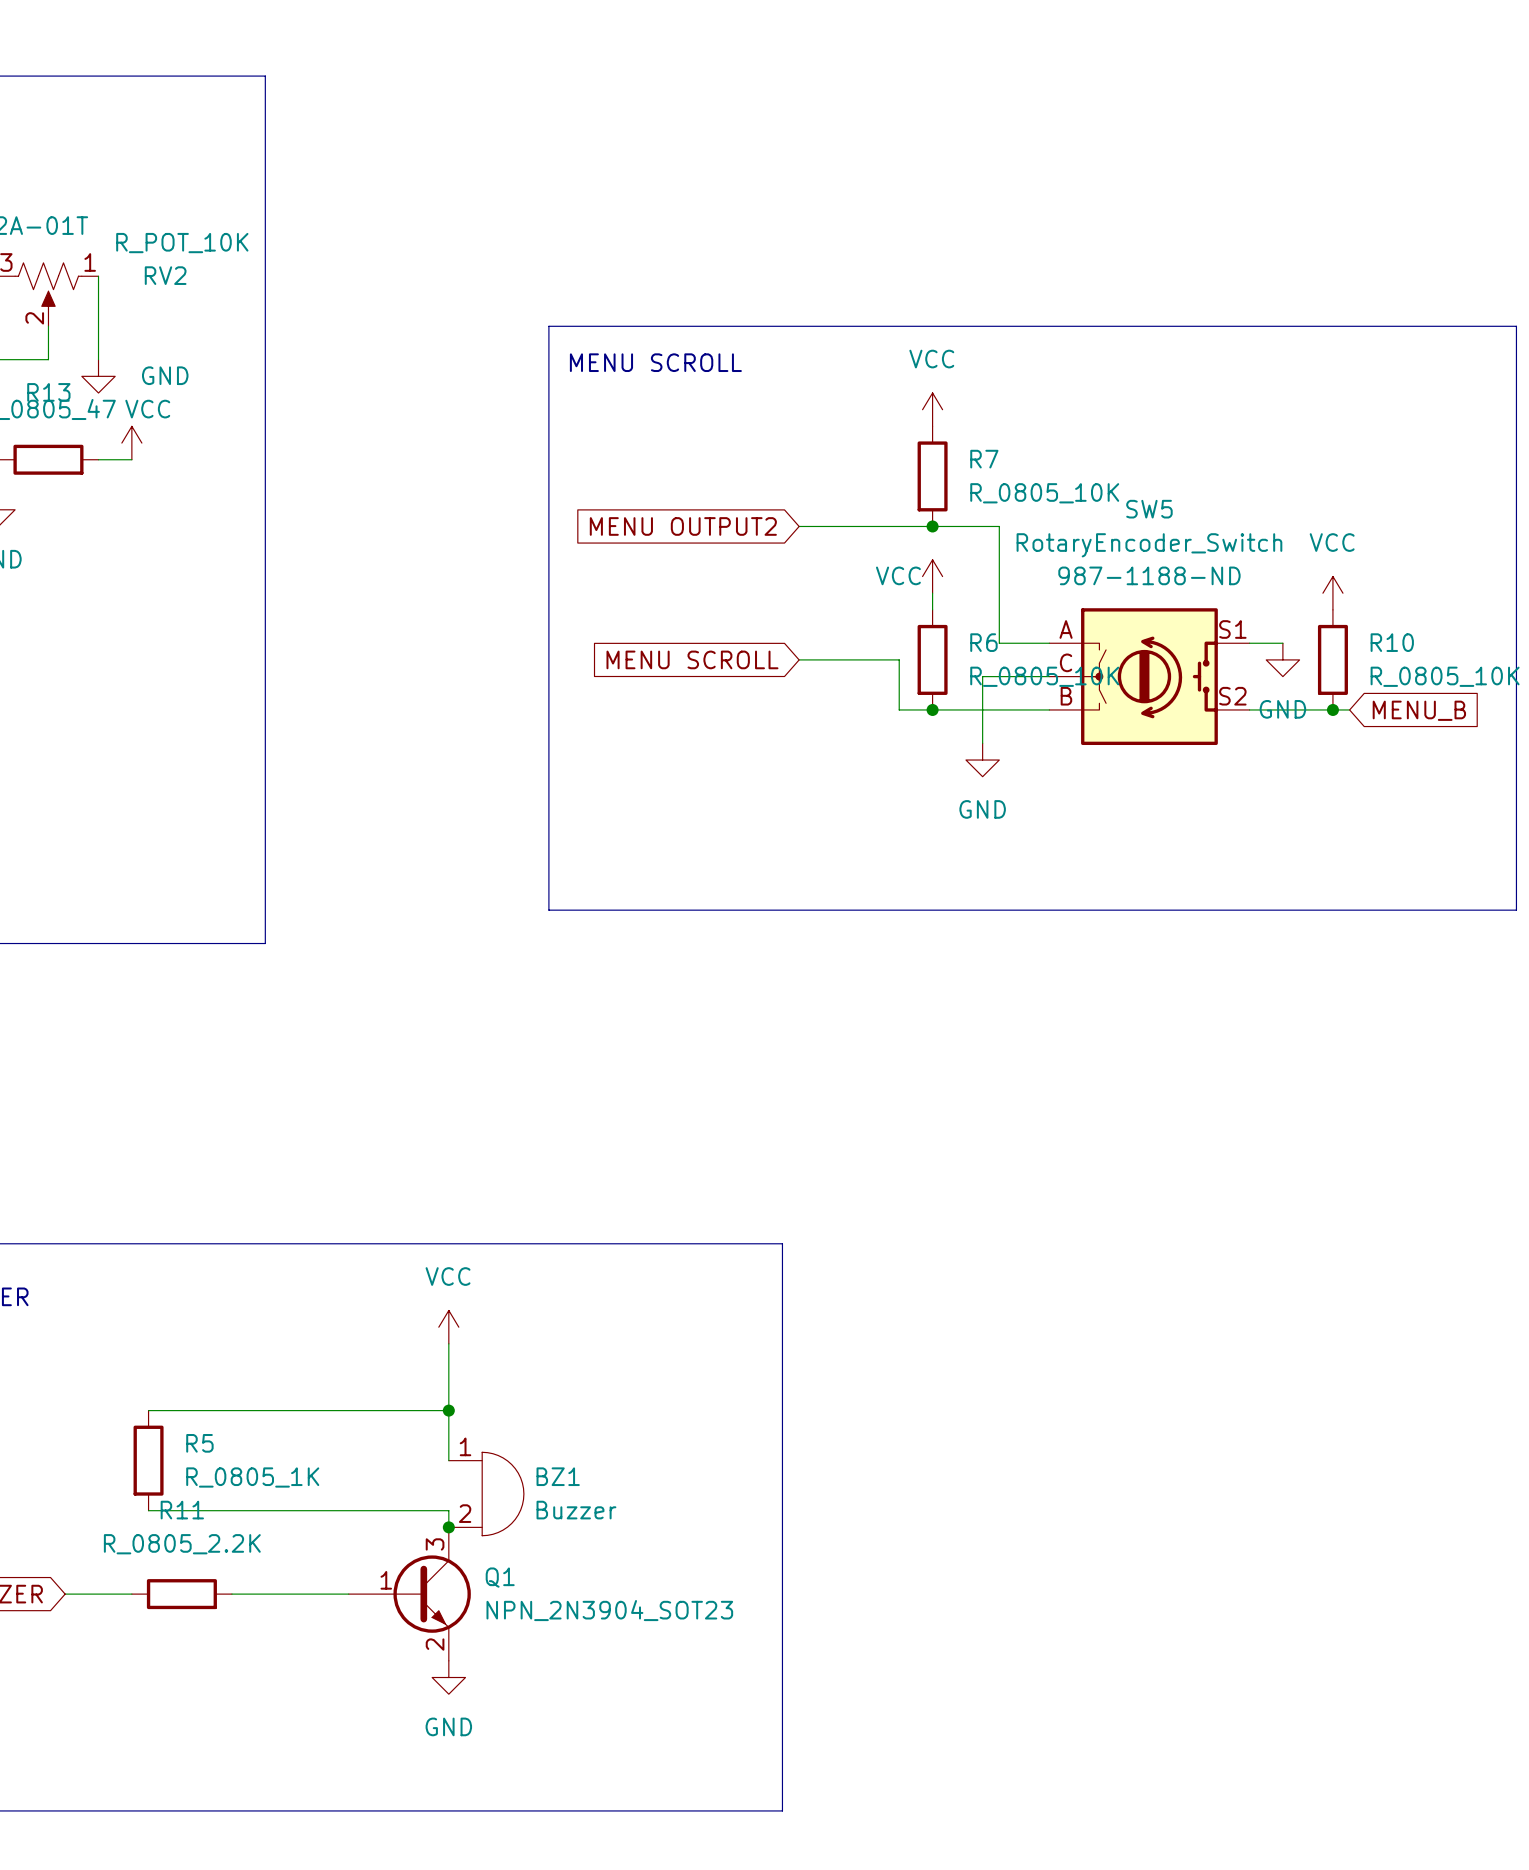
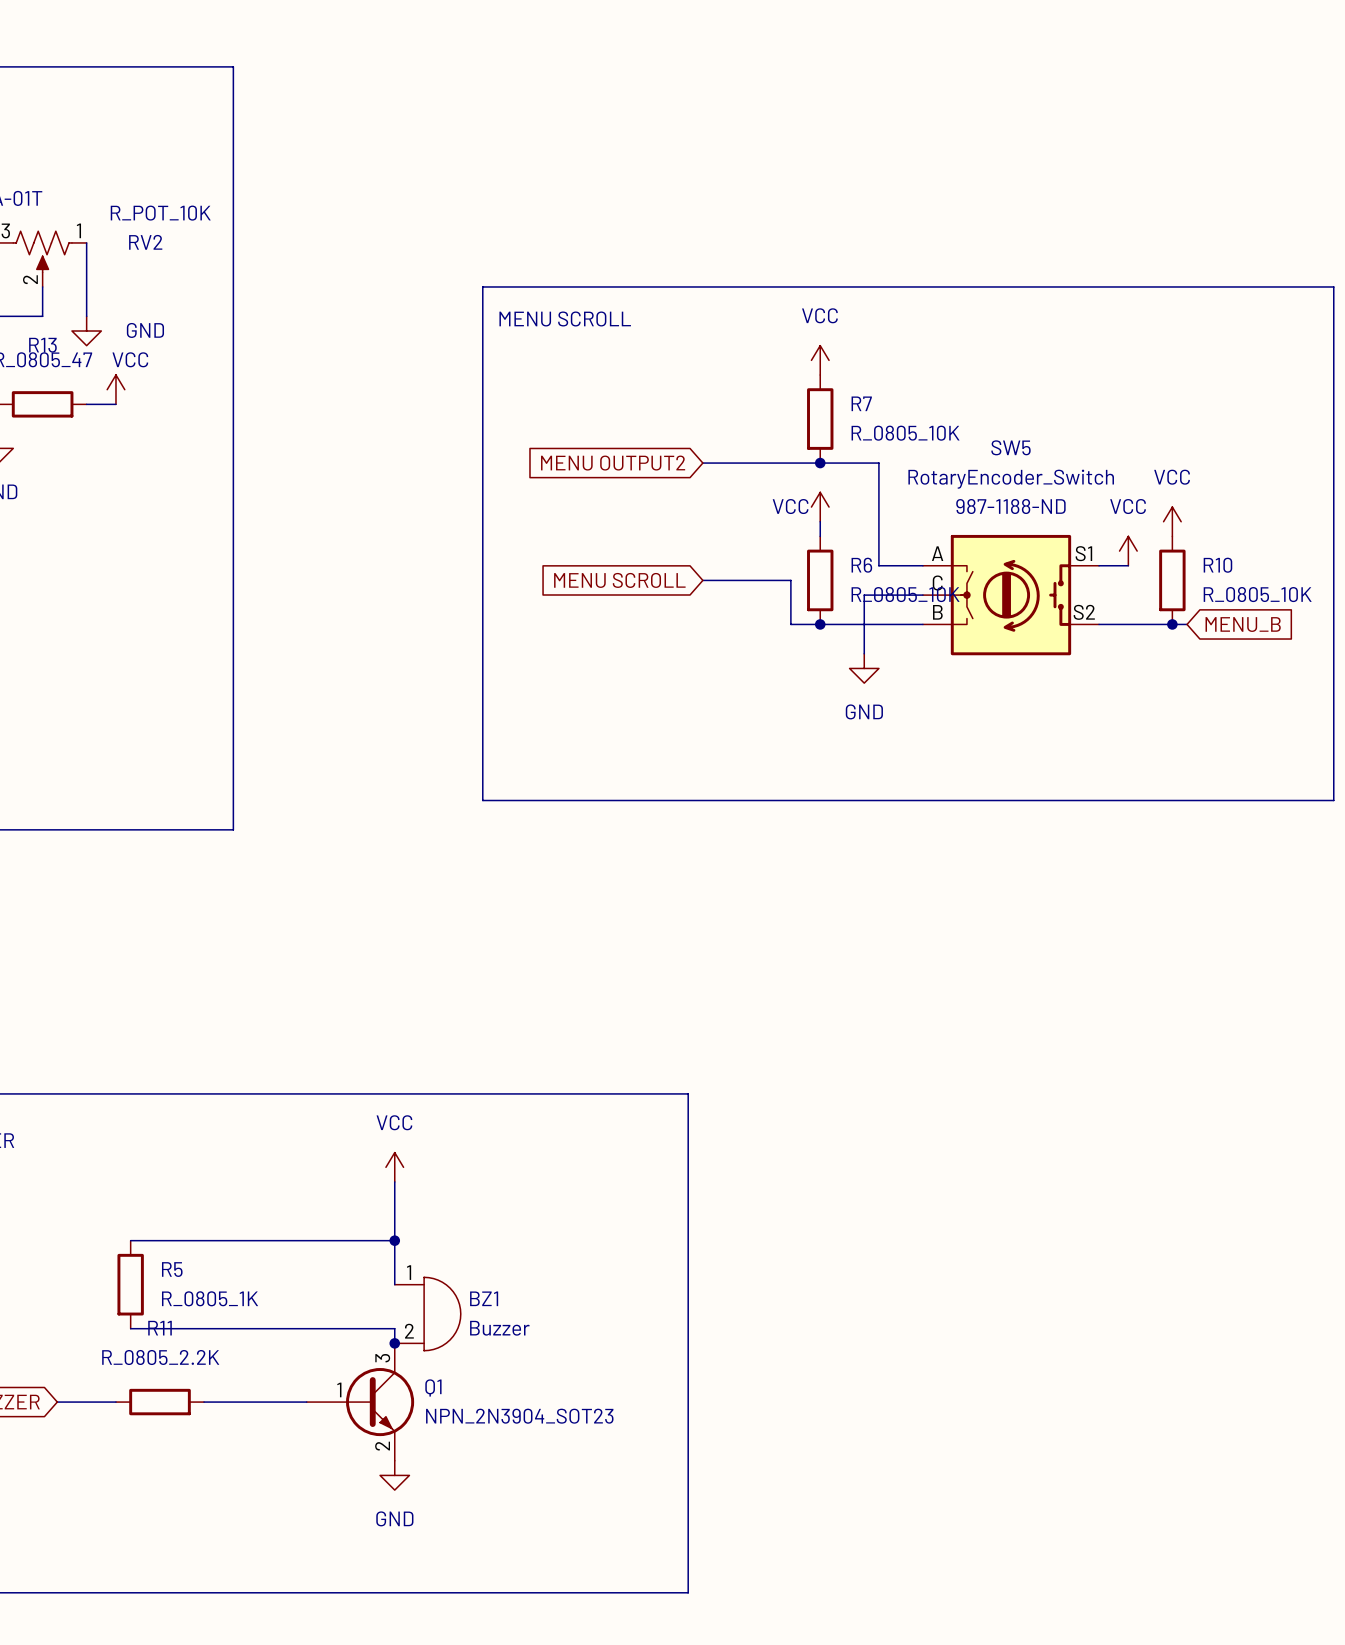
power symbol: none -> VCC (1128, 551)
power symbol: GND (1282, 659) -> none

